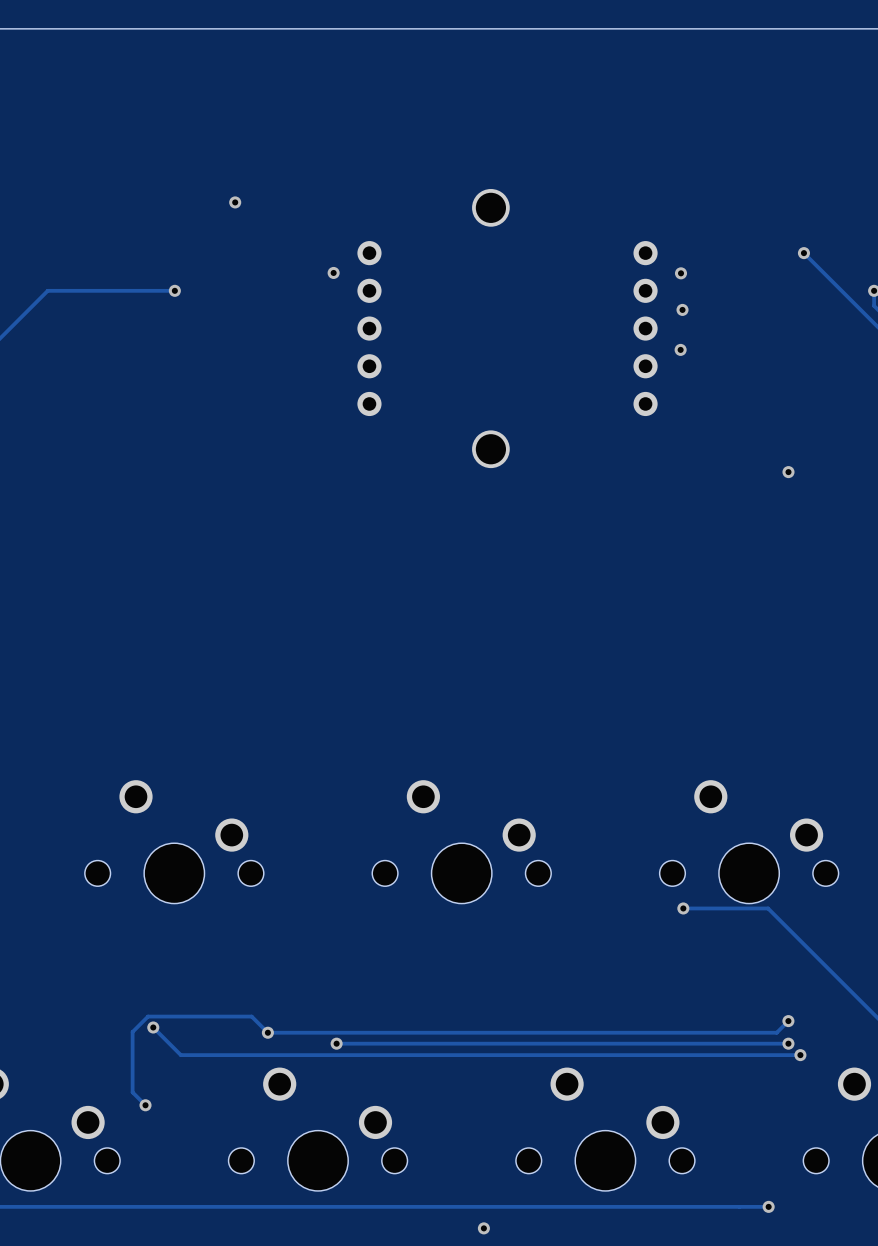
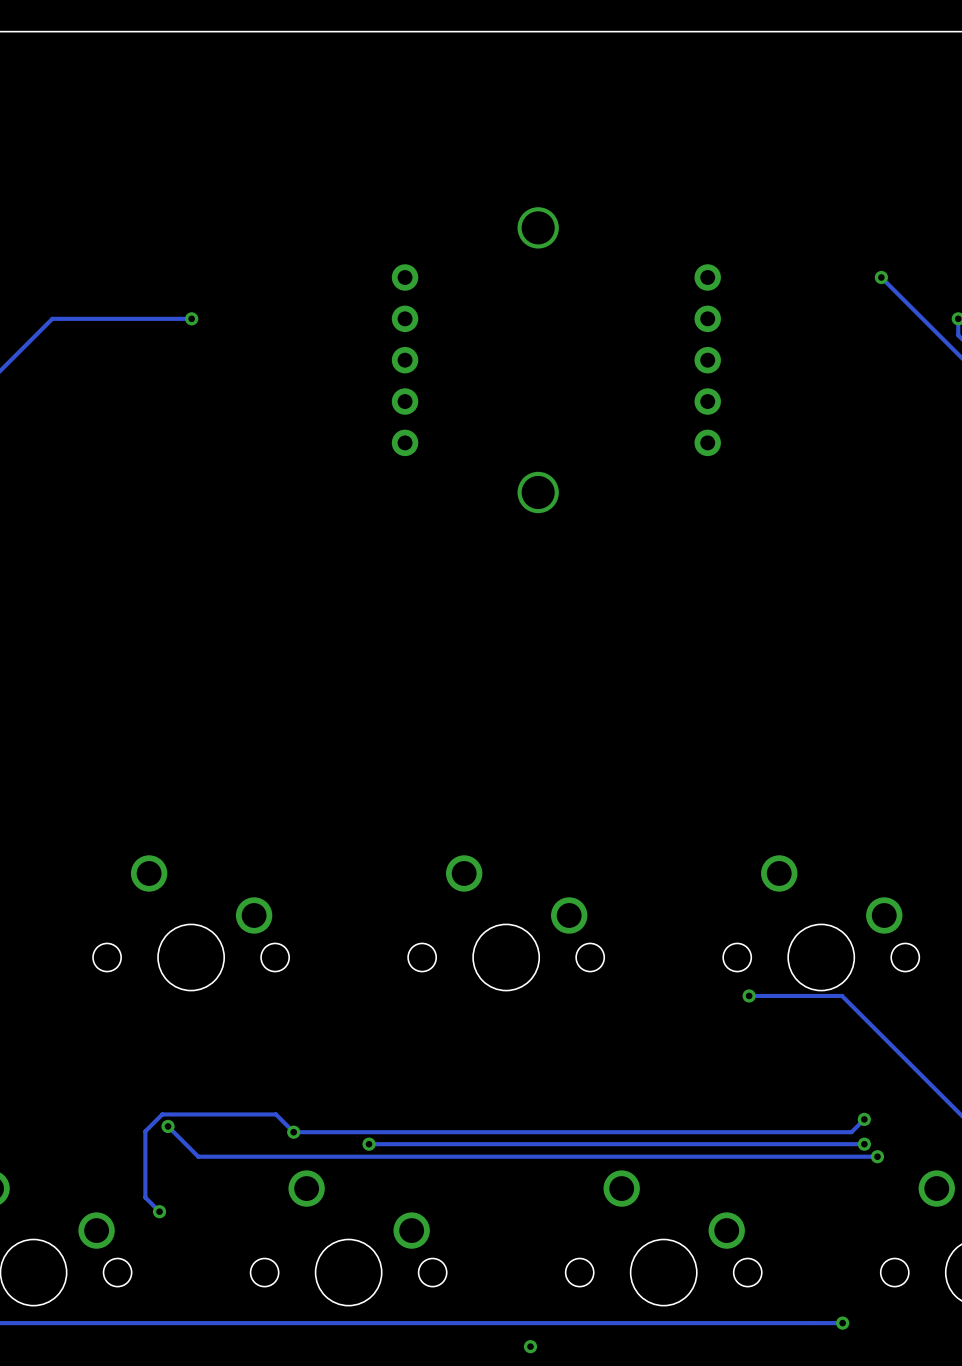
via: (235, 202) -> none
via: (333, 272) -> none
via: (681, 273) -> none
via: (682, 309) -> none
via: (680, 349) -> none
via: (788, 472) -> none

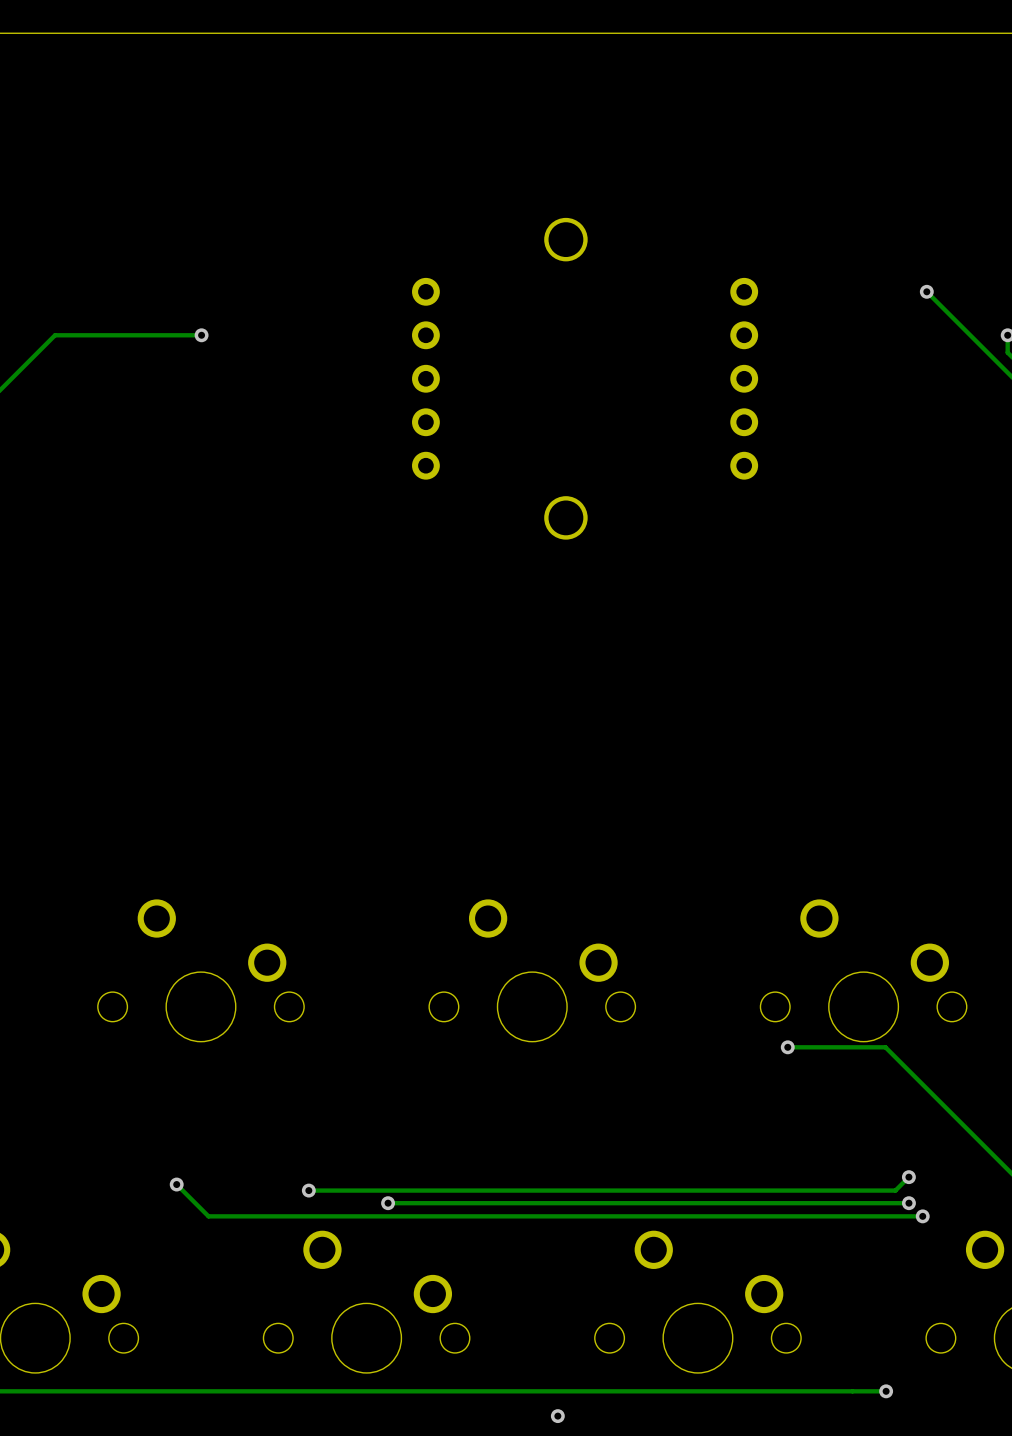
track: (293, 1132) (275, 1114) (162, 1114) (145, 1131) (145, 1197) (159, 1211) -> none
via: (159, 1211) -> none

